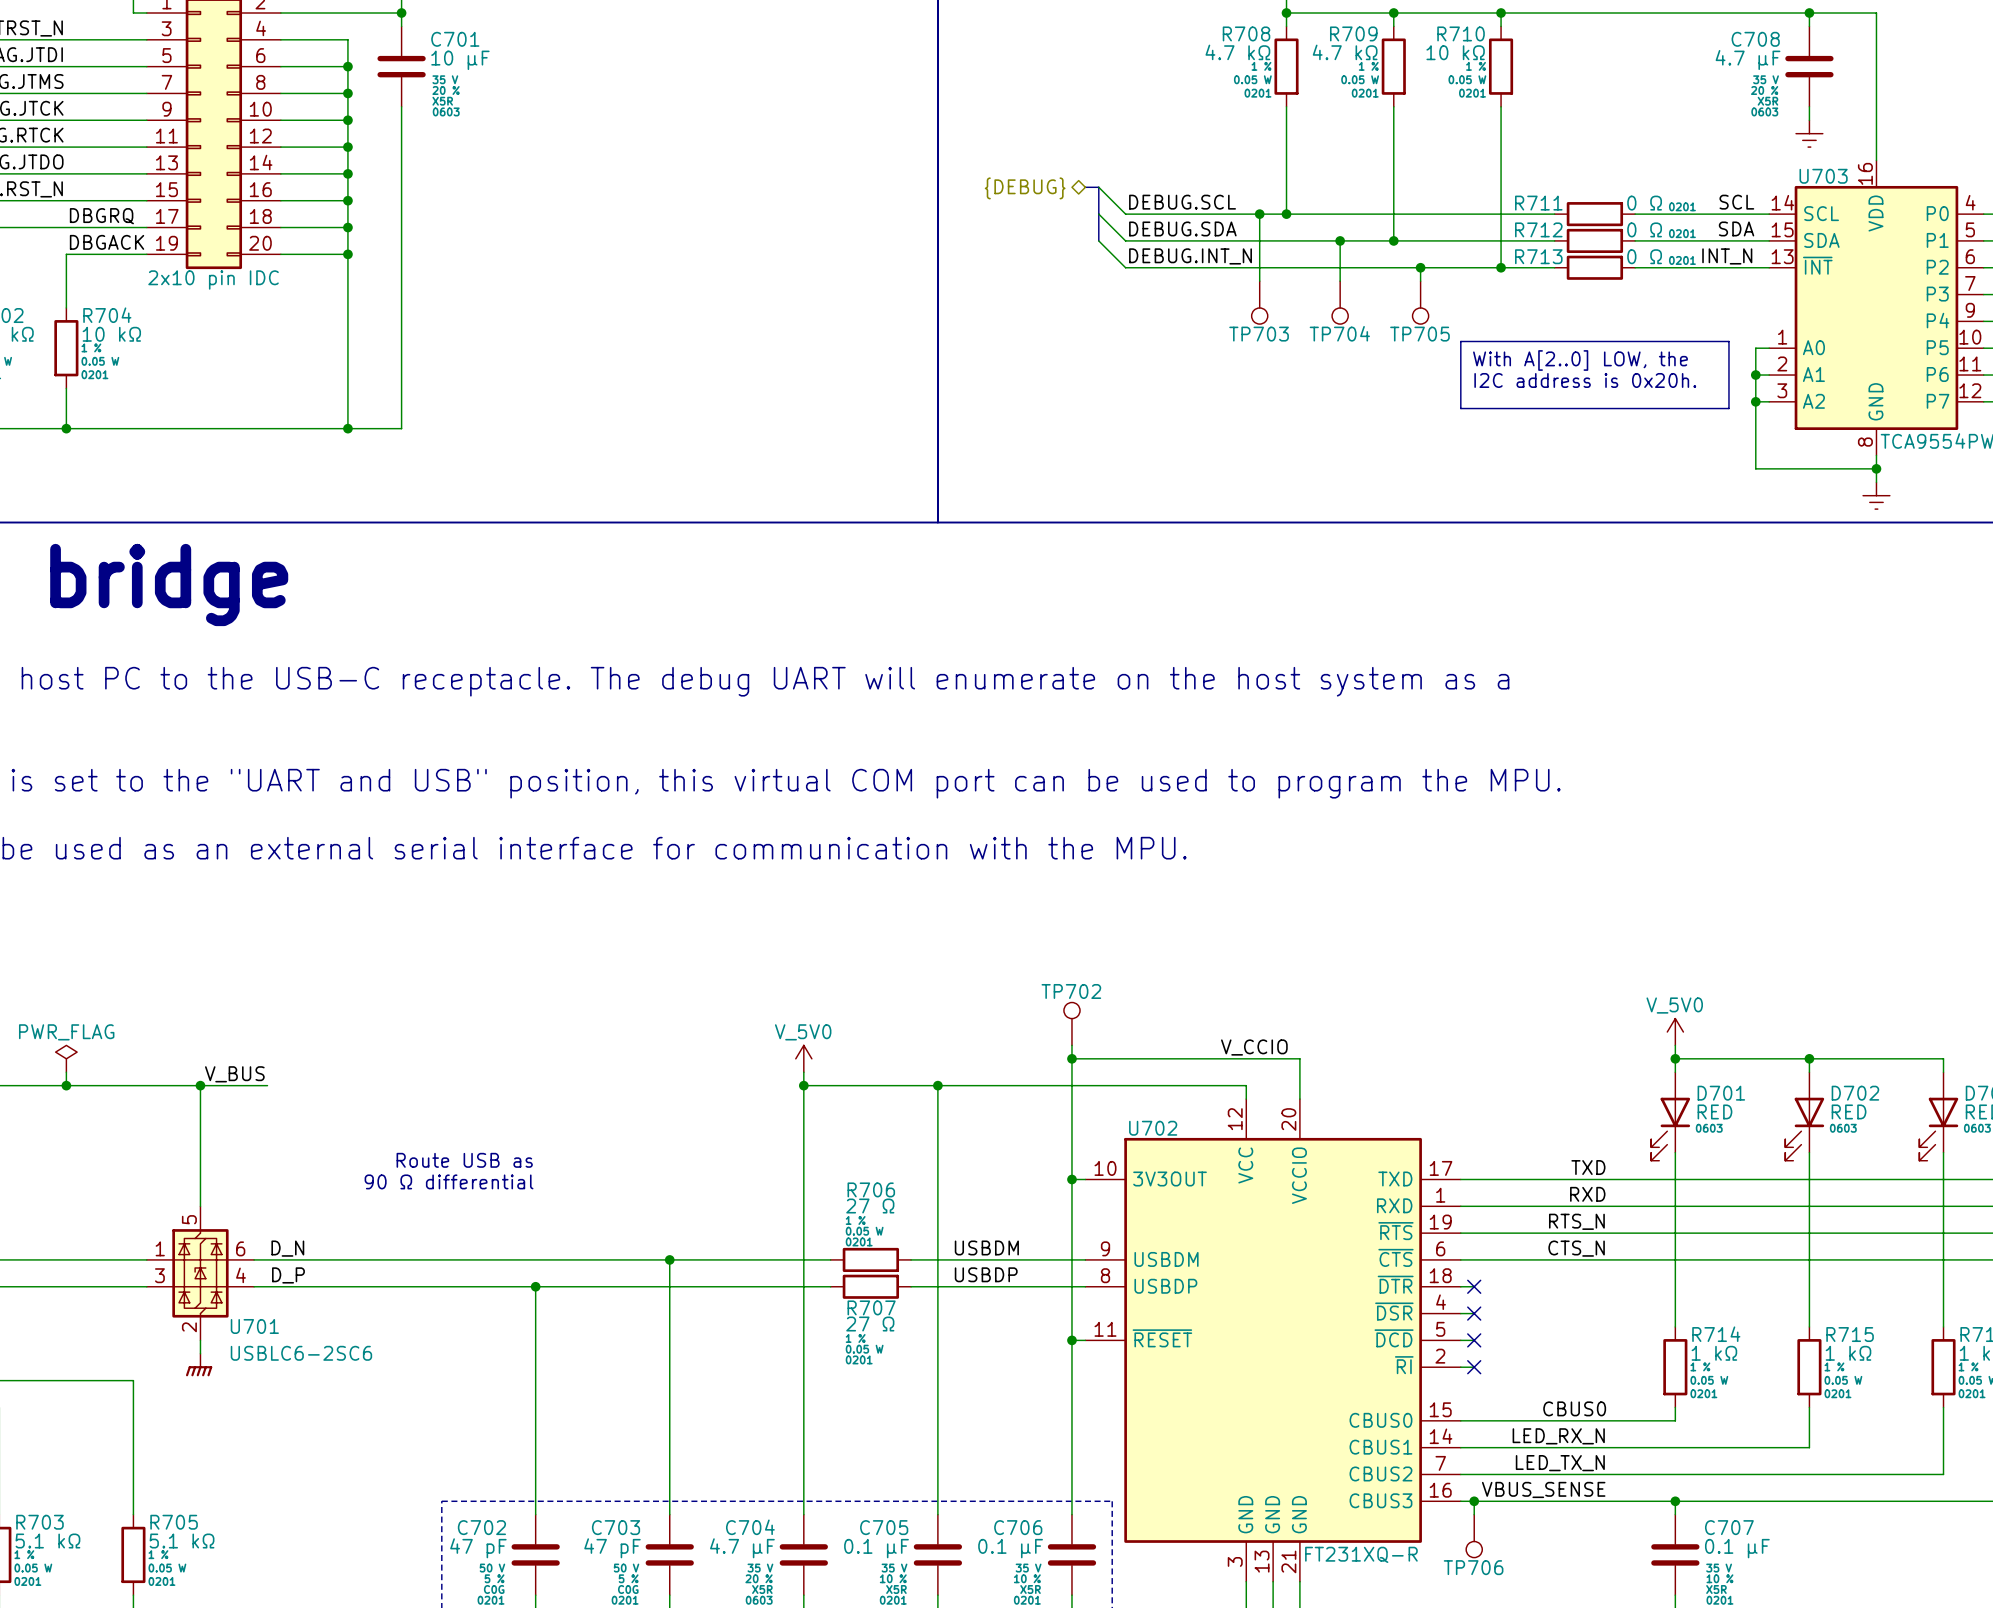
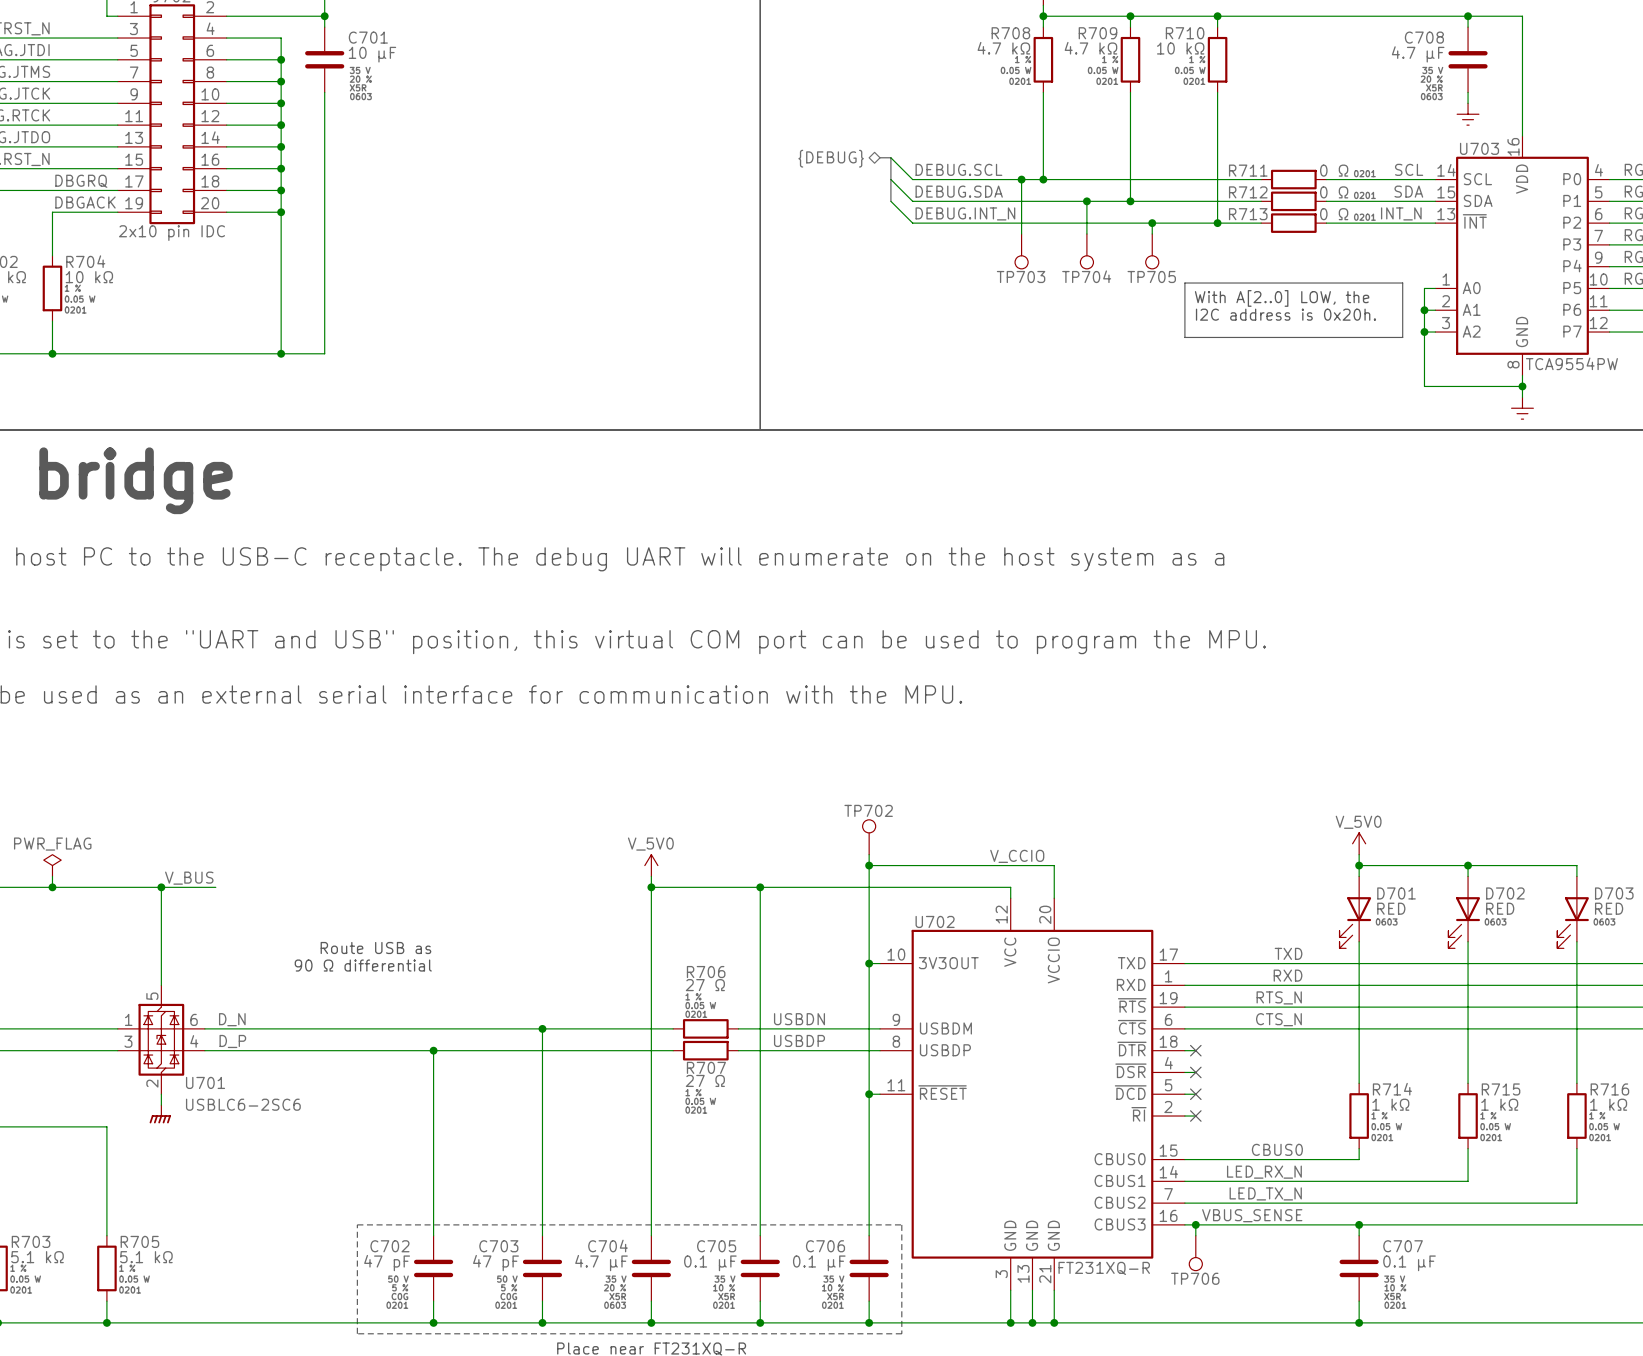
label: USBDM (986, 1247) -> USBDN (799, 1019)

